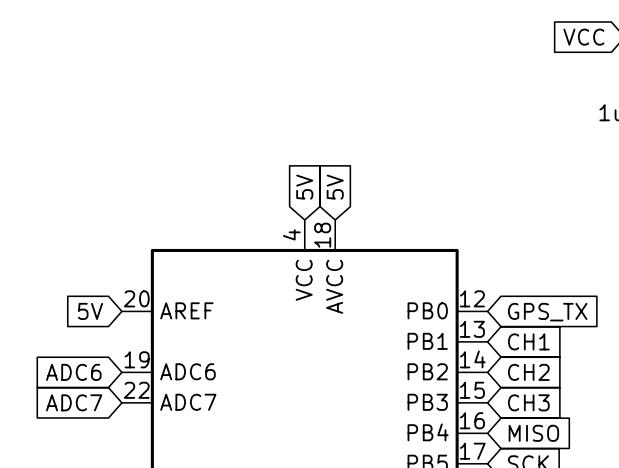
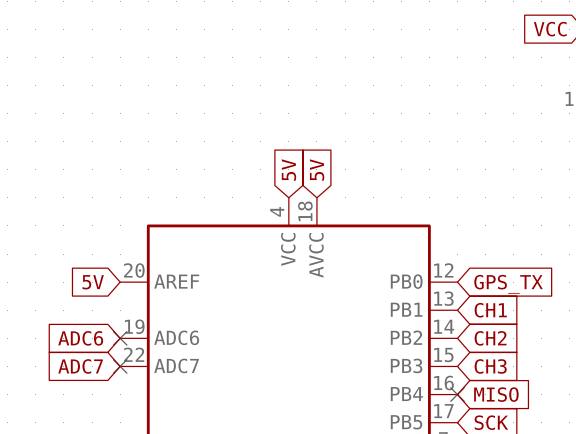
no-connect mark: none -> (120, 338)
no-connect mark: none -> (120, 366)
no-connect mark: none -> (457, 394)

